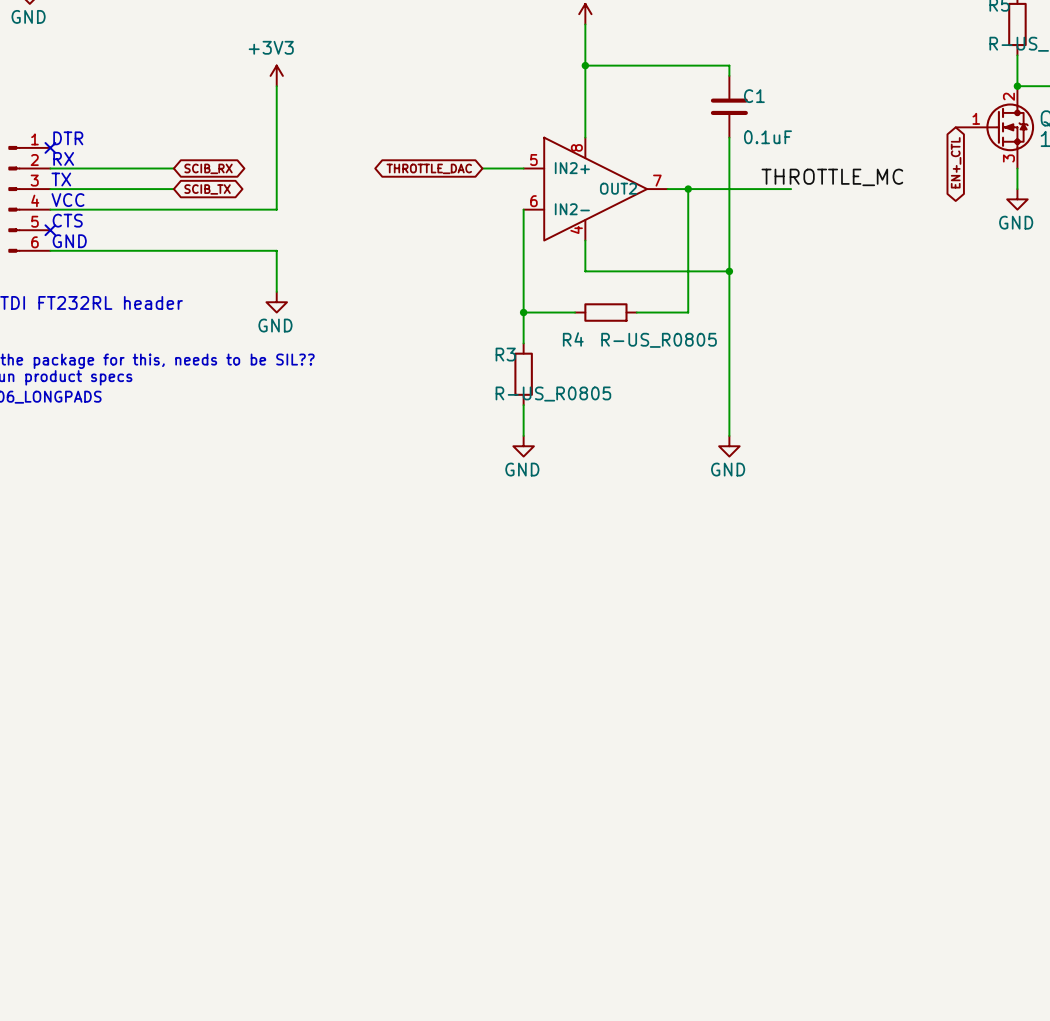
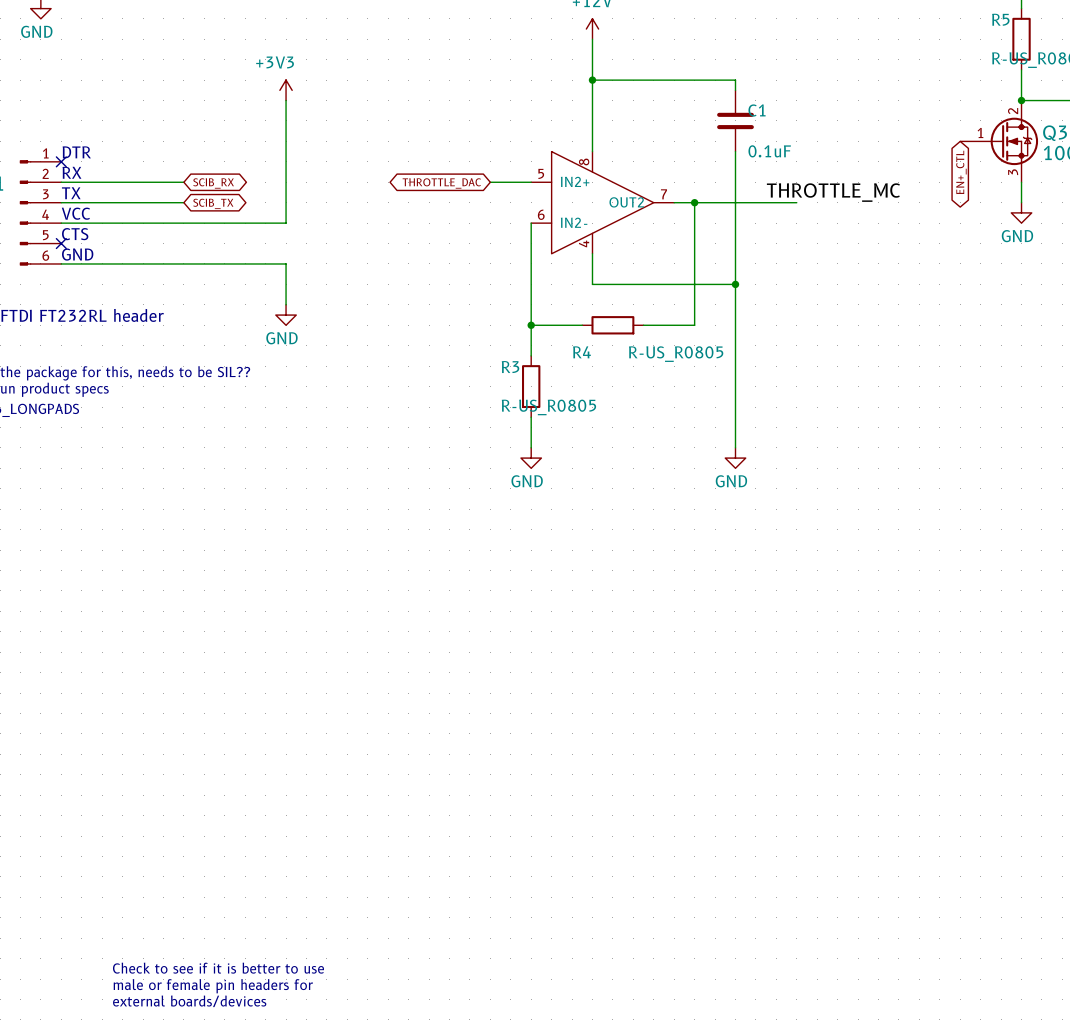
text: none -> Check to see if it is better to use (218, 968)
text: none -> male or female pin headers for (213, 986)
text: none -> external boards/devices (189, 1001)

